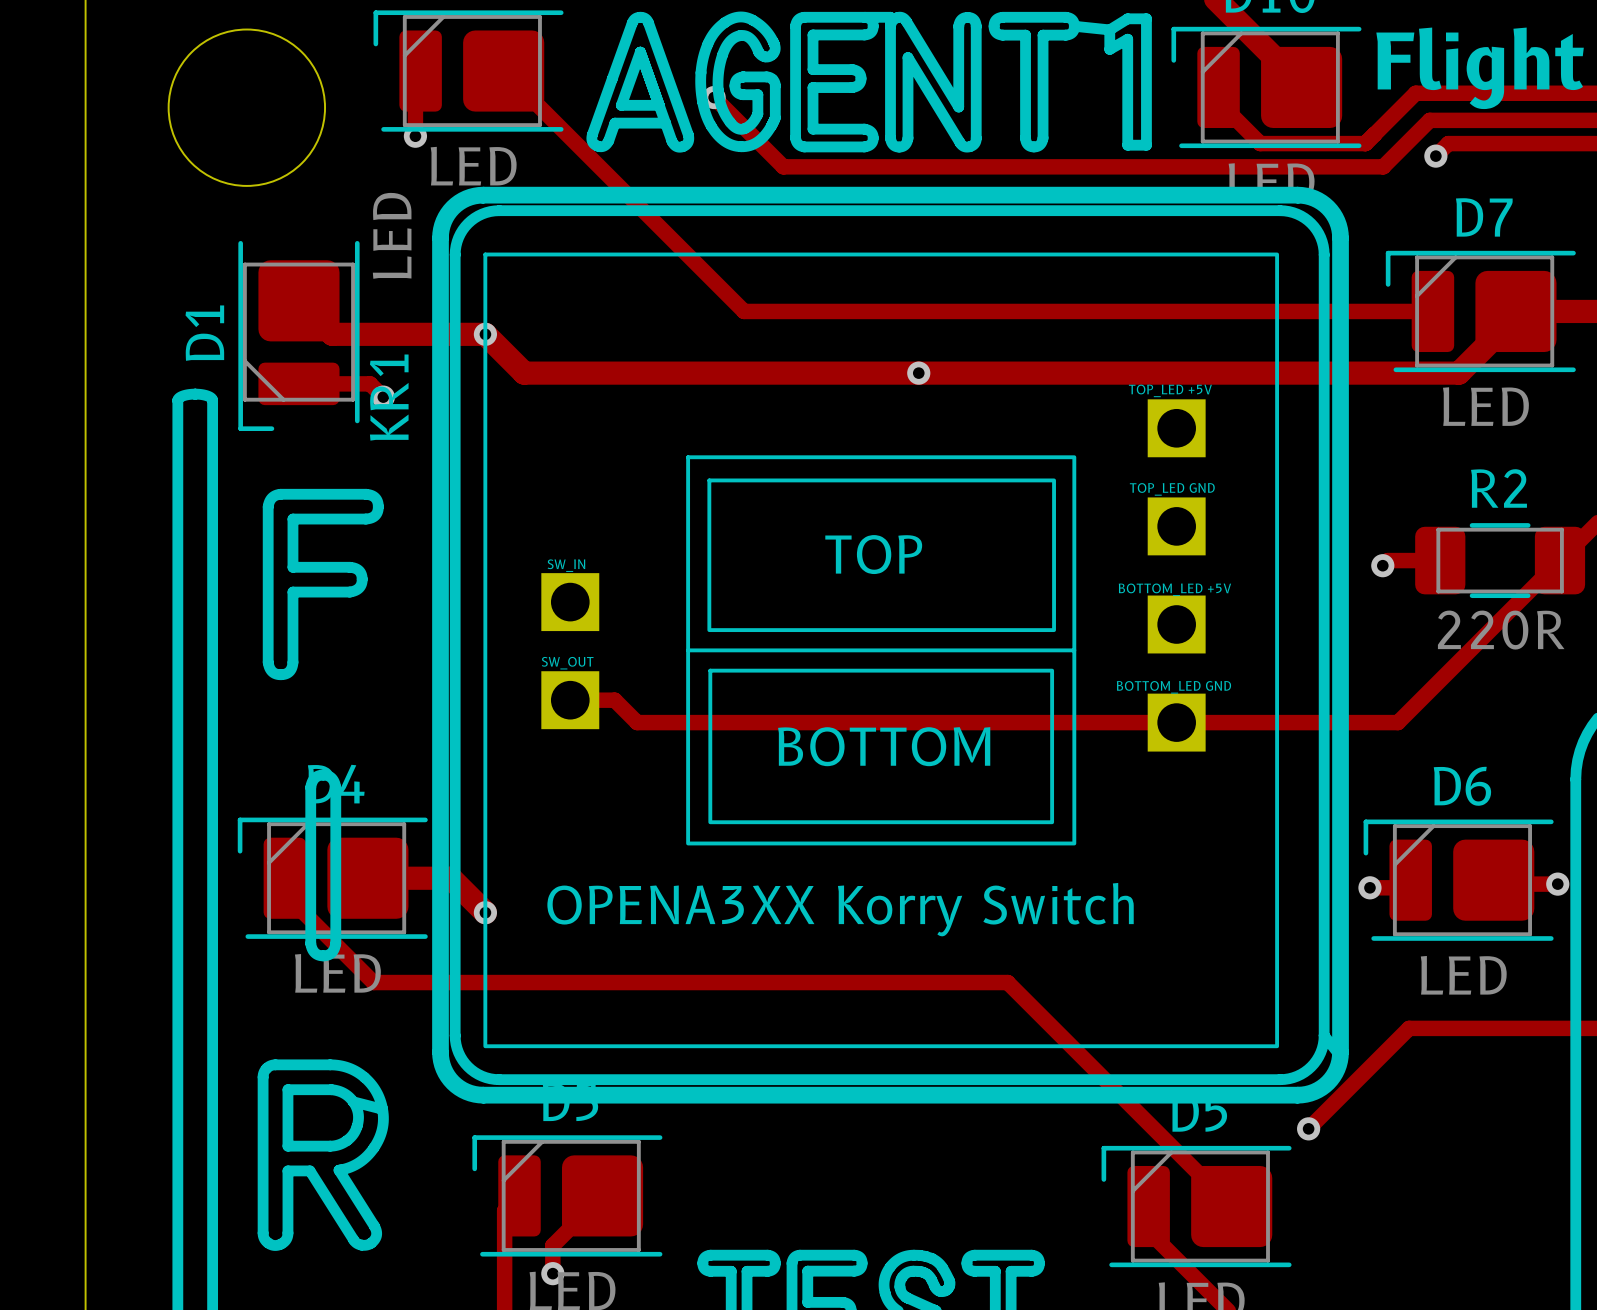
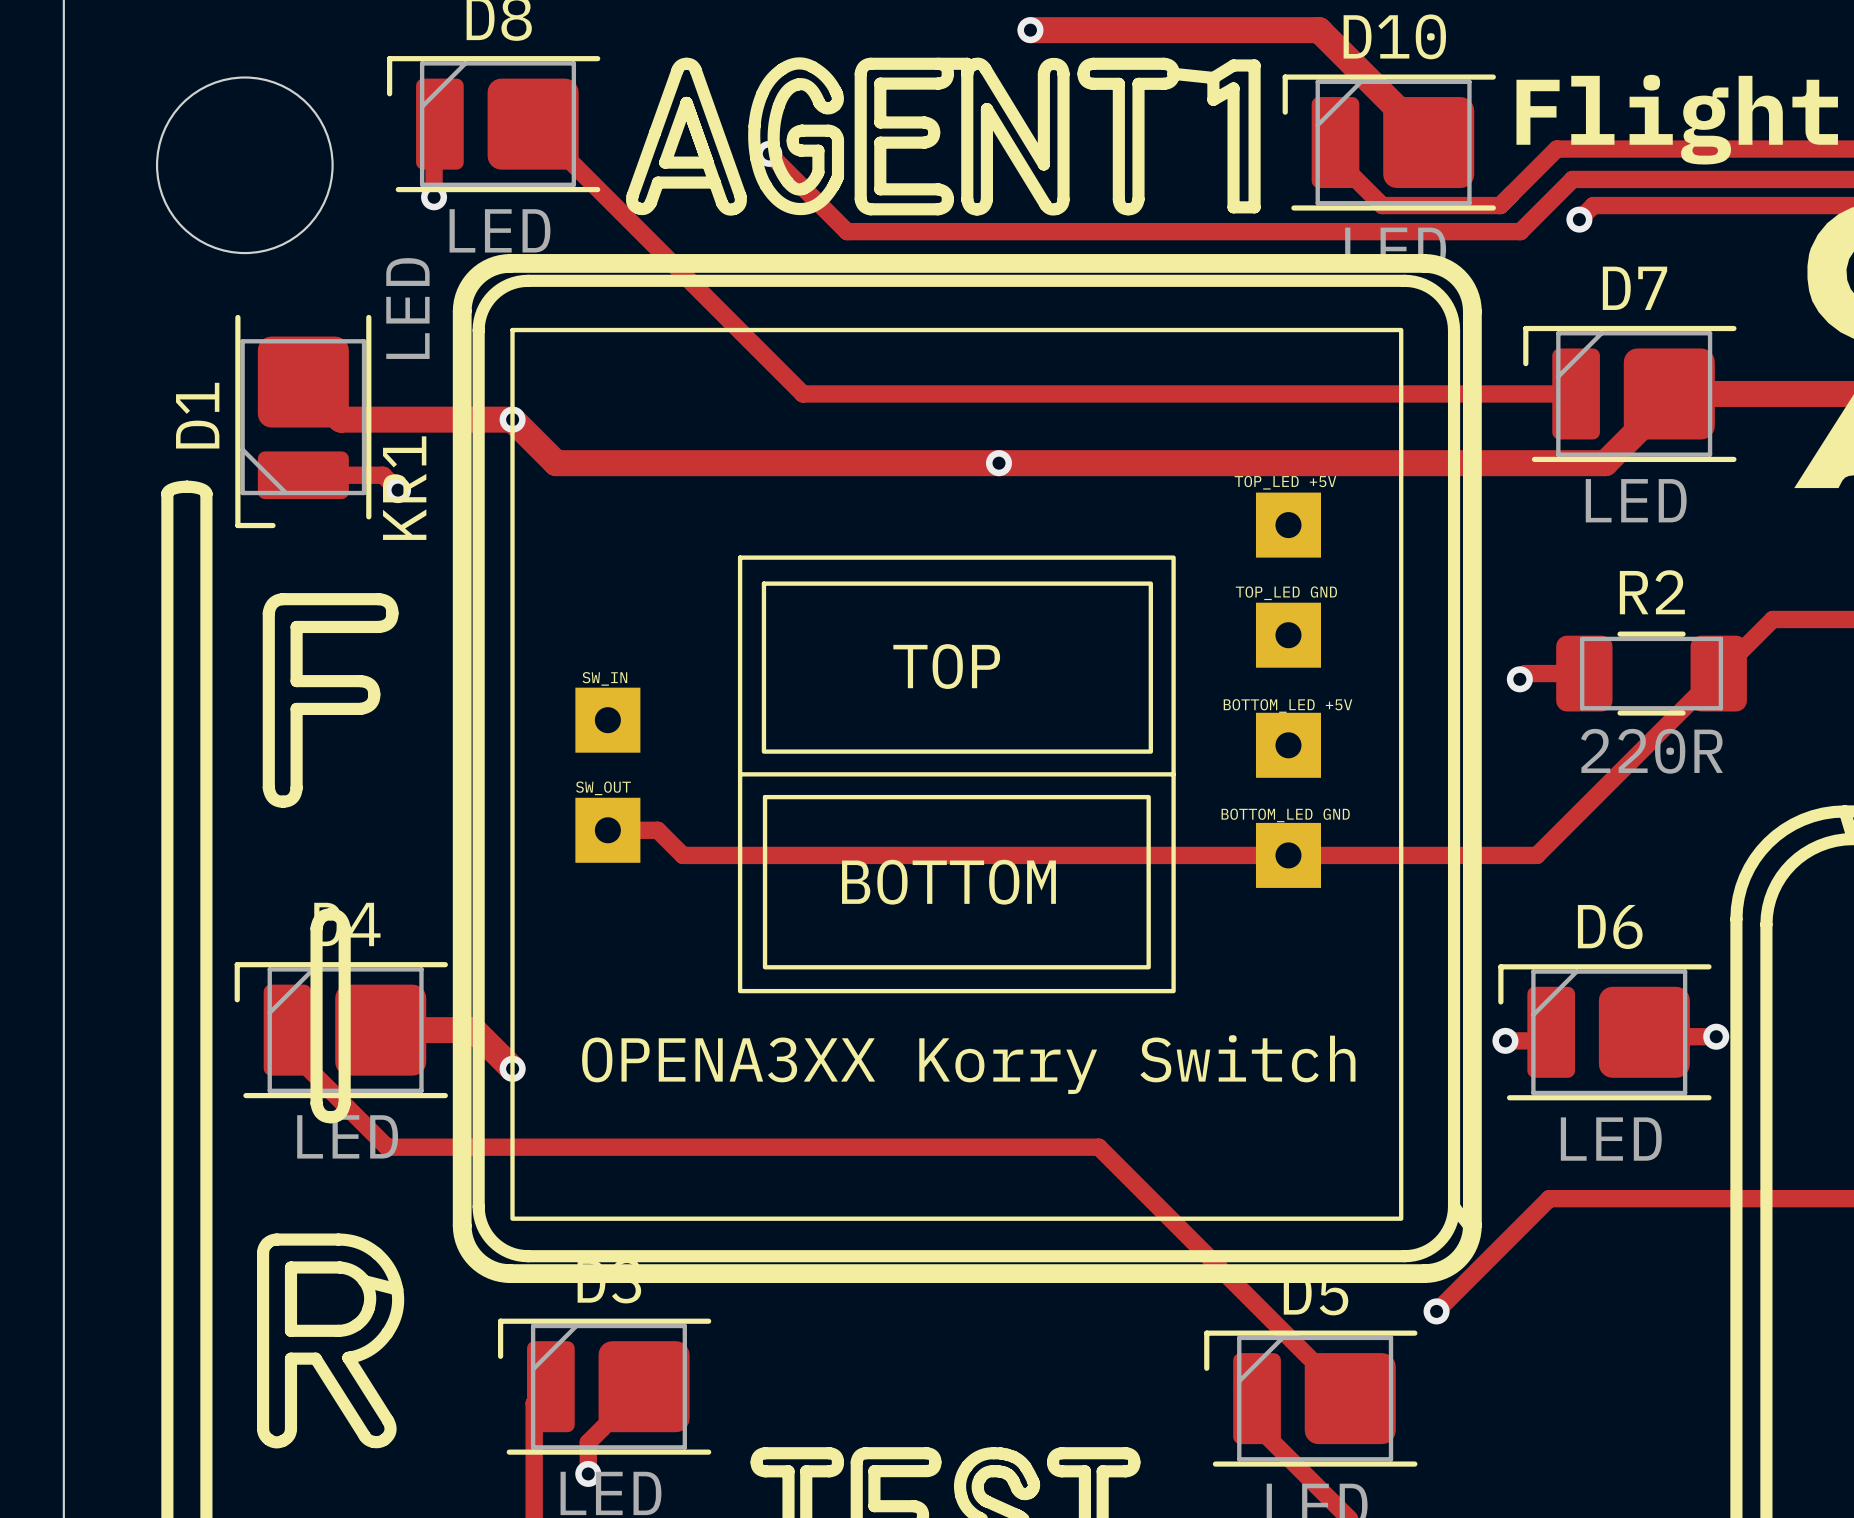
KR1 footprint: [483, 252, 1280, 1049] -> [510, 327, 1404, 1221]

